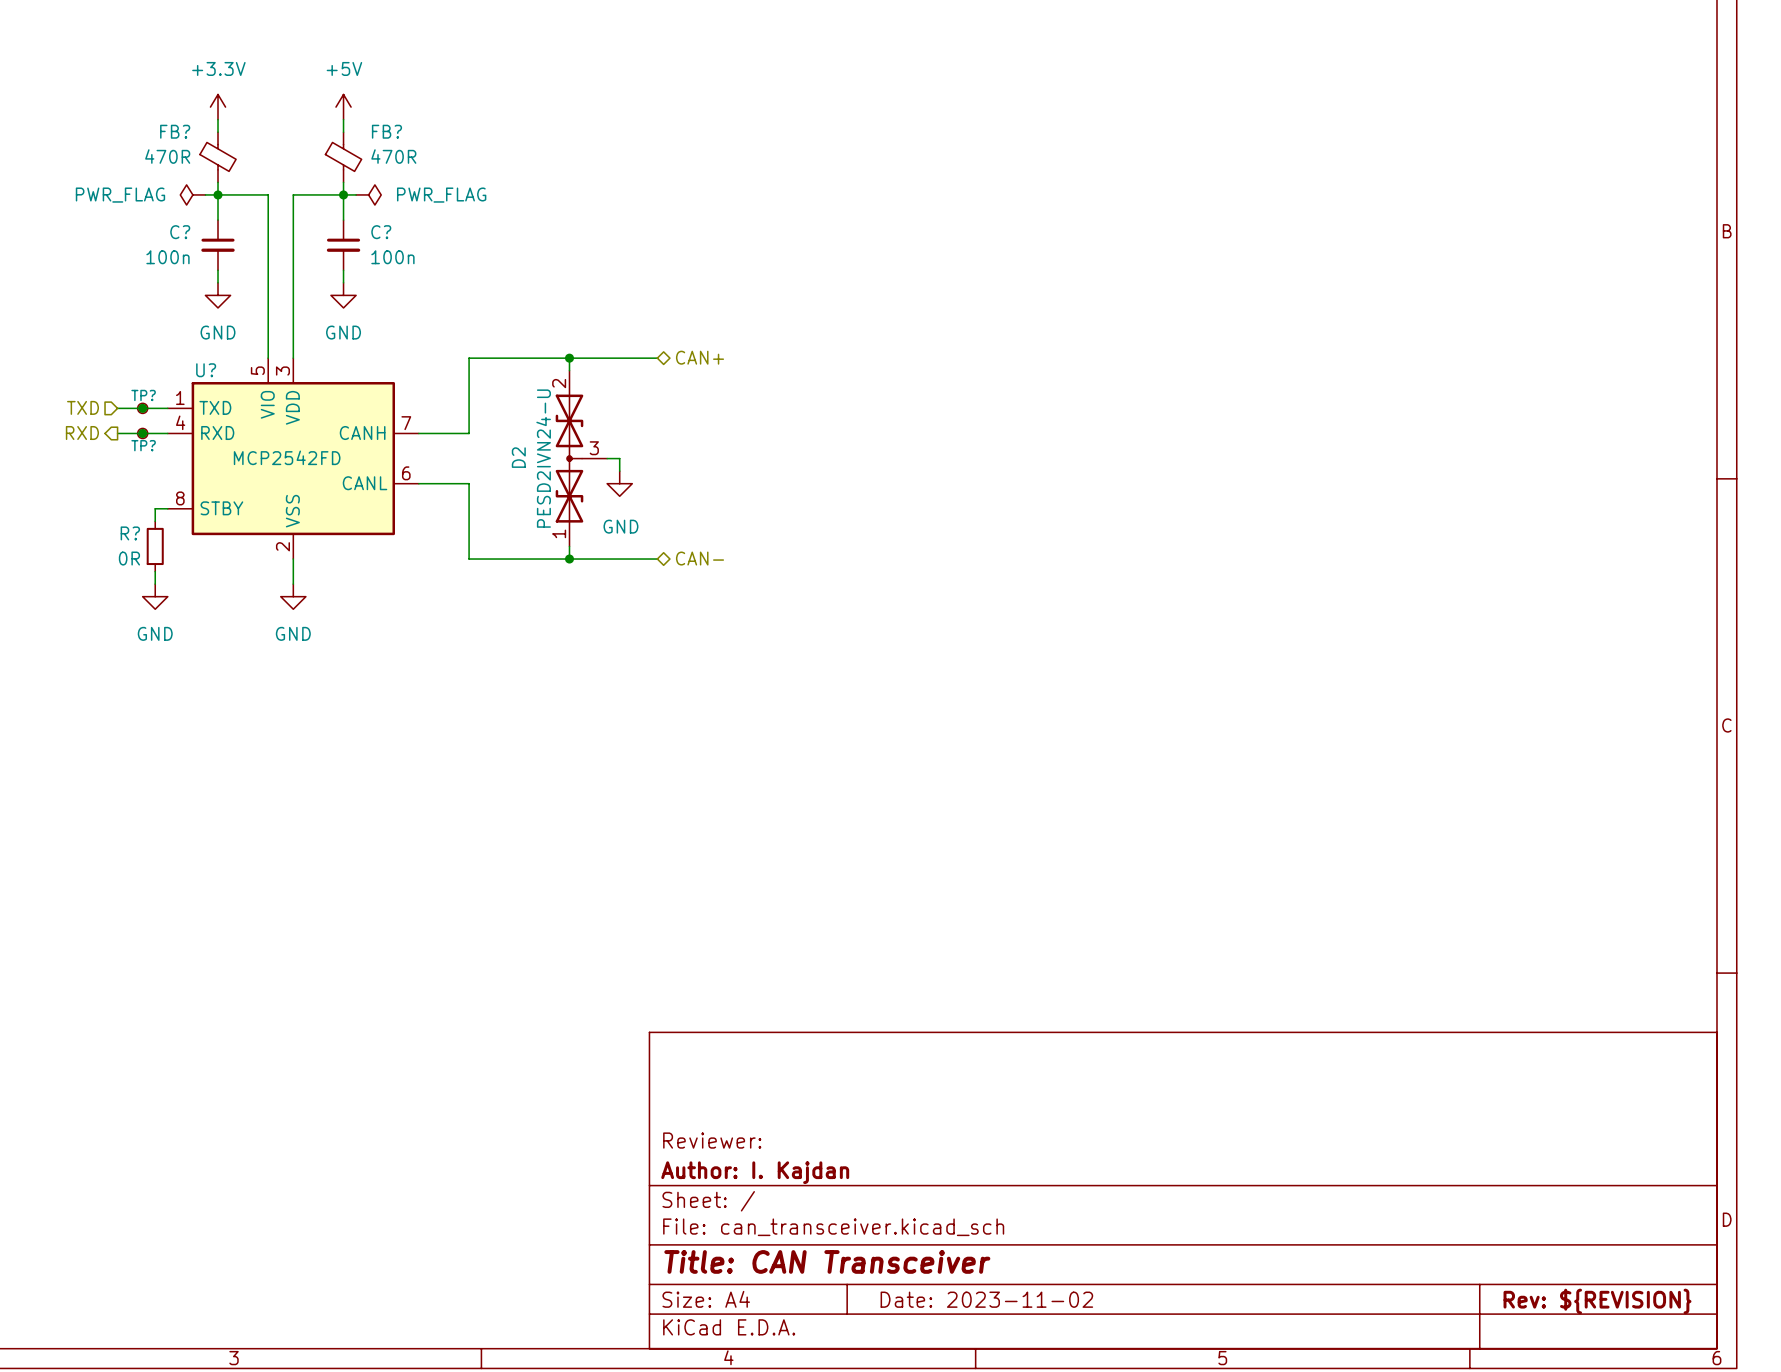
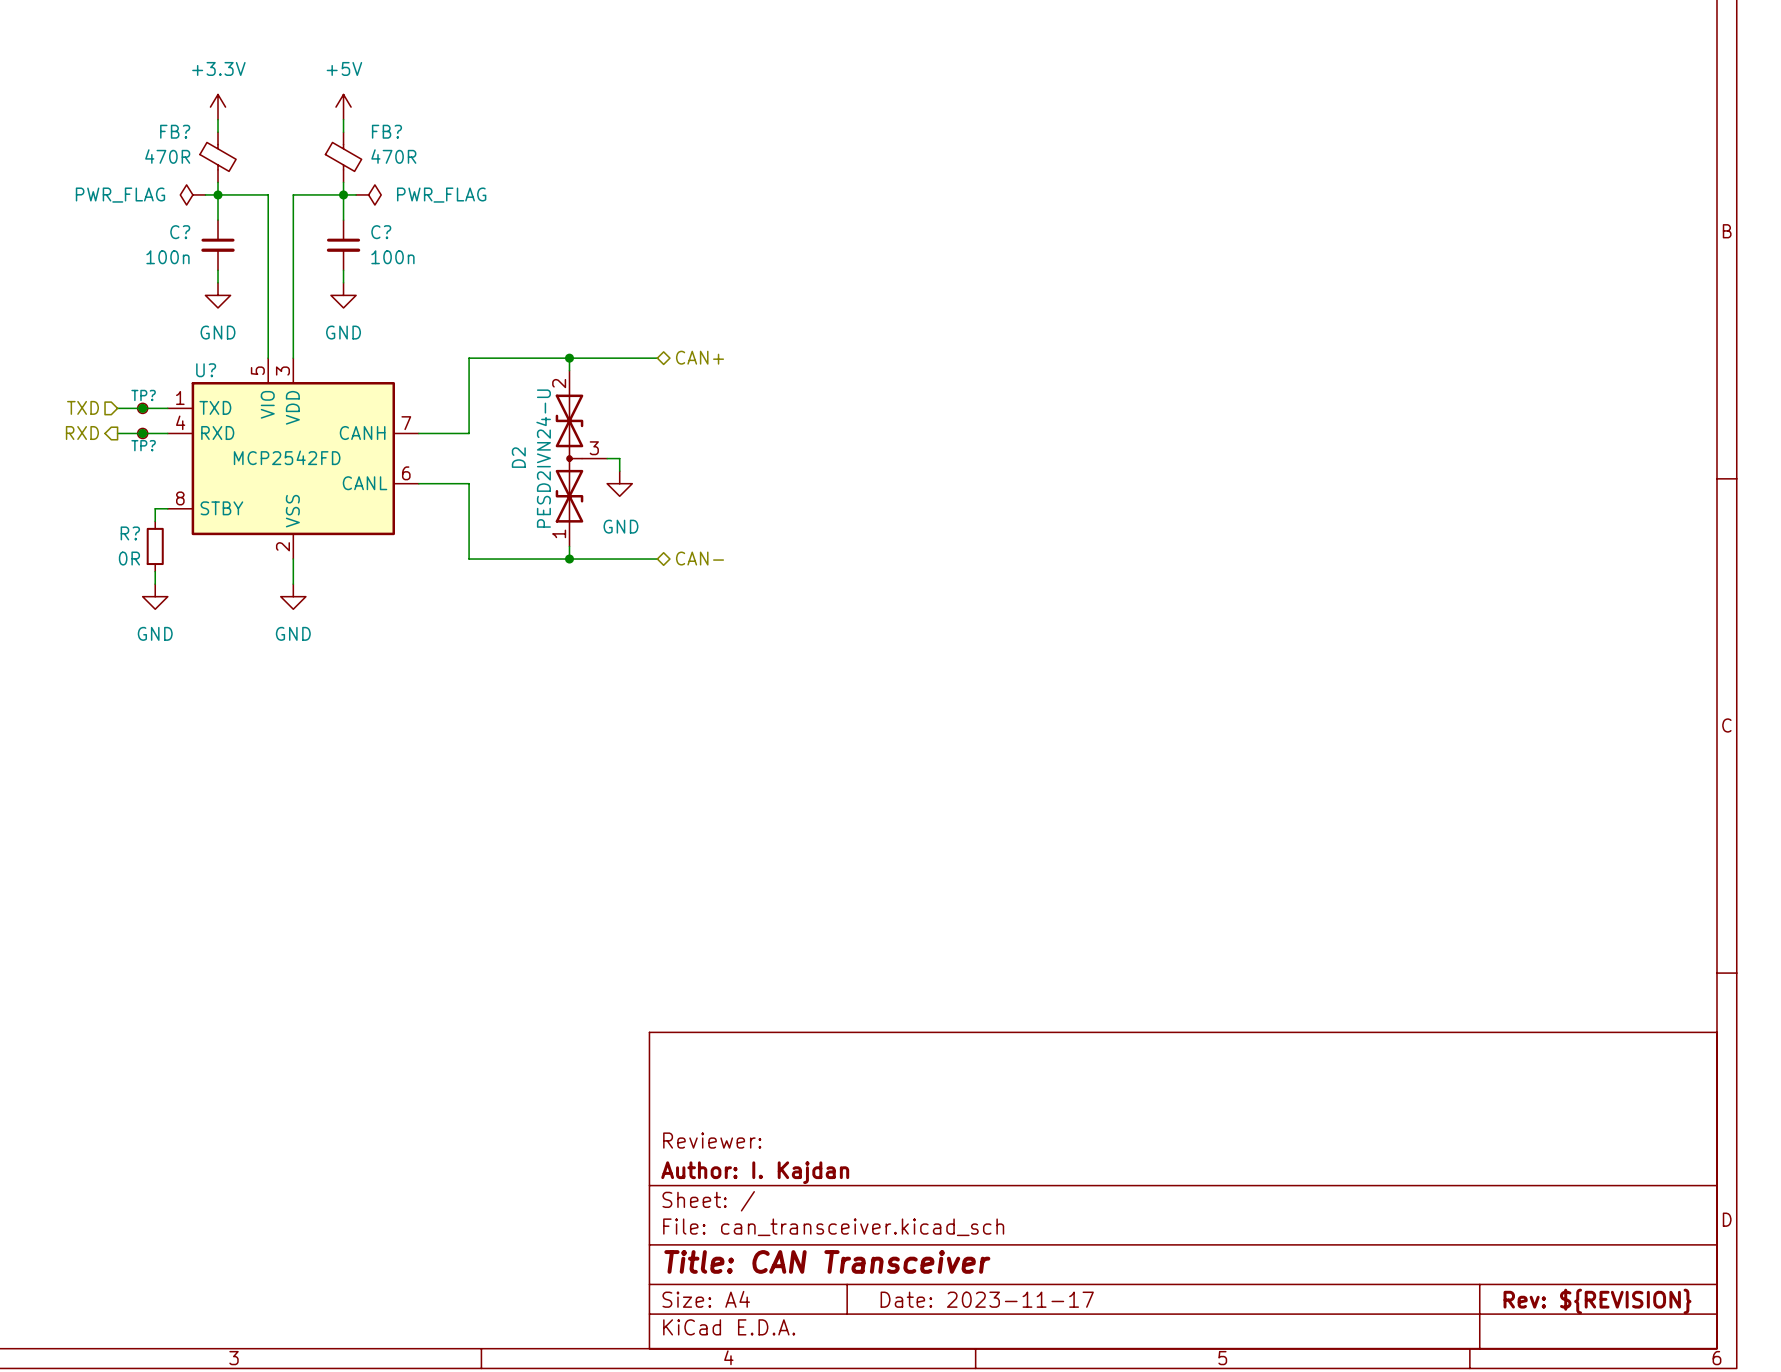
title block: Date: 2023-11-02 (986, 1299) -> Date: 2023-11-17 (987, 1299)

